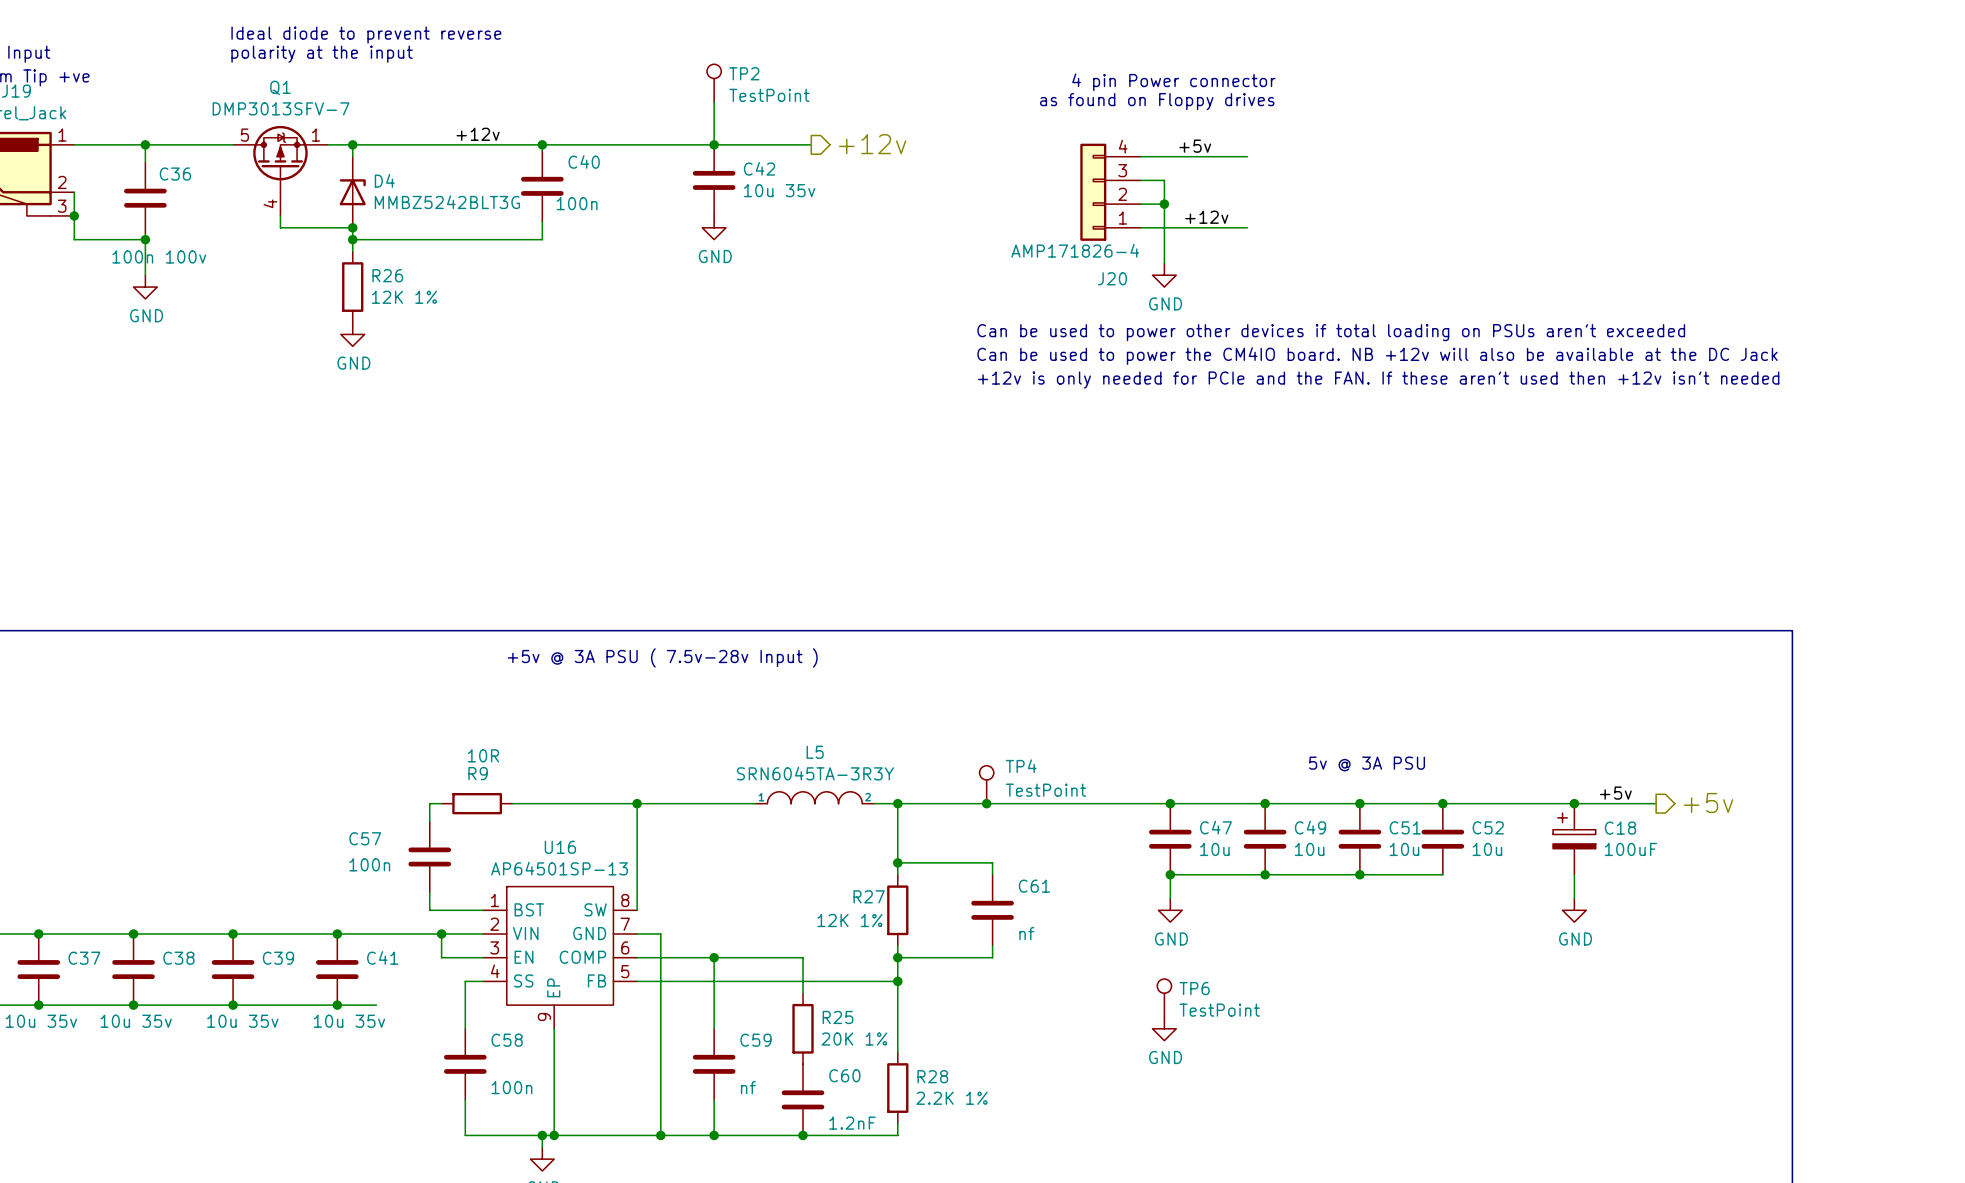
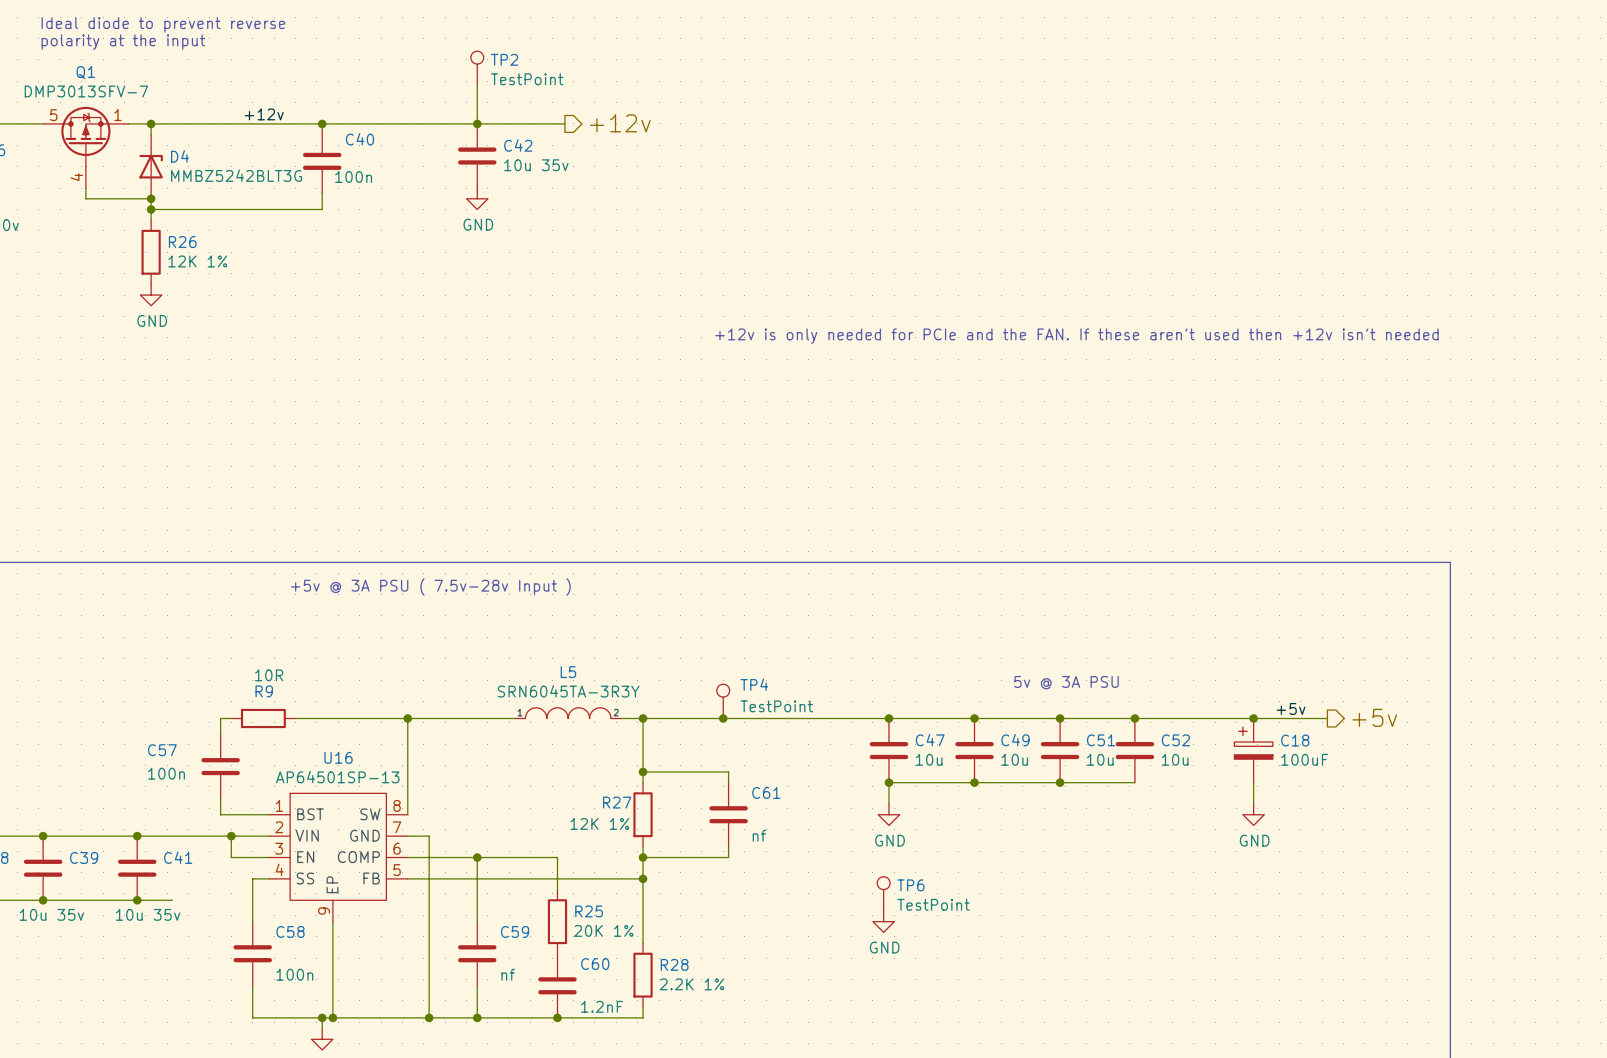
text: 4 pin Power connector (1173, 82) -> none
text: as found on Floppy drives (1157, 101) -> none
label: +5v (1195, 146) -> none
wire: (1140, 156) (1247, 156) -> none
wire: (1140, 180) (1164, 180) (1164, 263) -> none
J20: AMP171826-4 (1110, 192) -> none
wire: (1140, 204) (1164, 204) -> none
junction: (1164, 204) -> none
label: +12v (1206, 217) -> none
wire: (1140, 227) (1247, 227) -> none
power symbol: GND (1164, 275) -> none
text: Can be used to power other devices if total loading on PSUs aren't exceeded (1331, 332) -> none
text: Can be used to power the CM4IO board. NB +12v will also be available at the DC Jack (1377, 356) -> none

